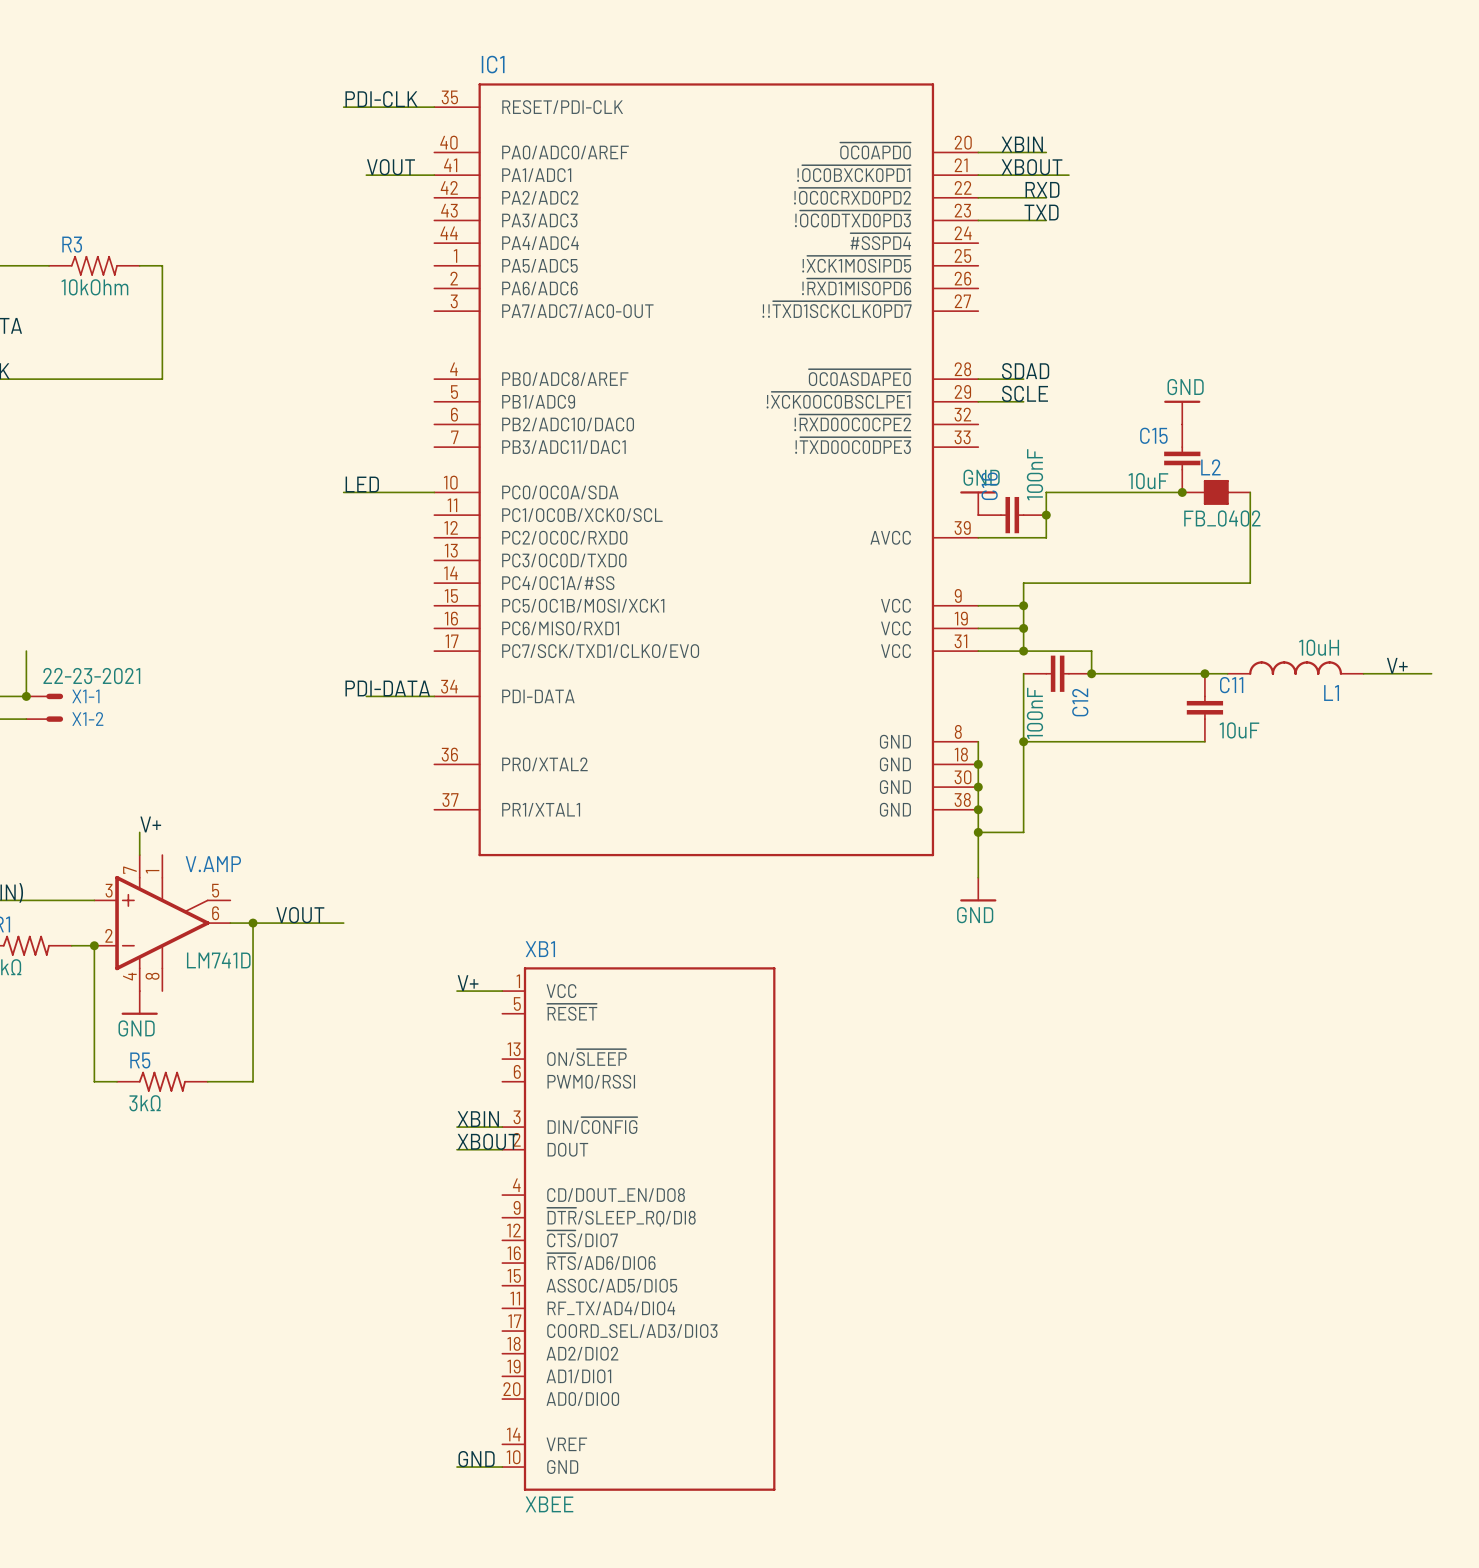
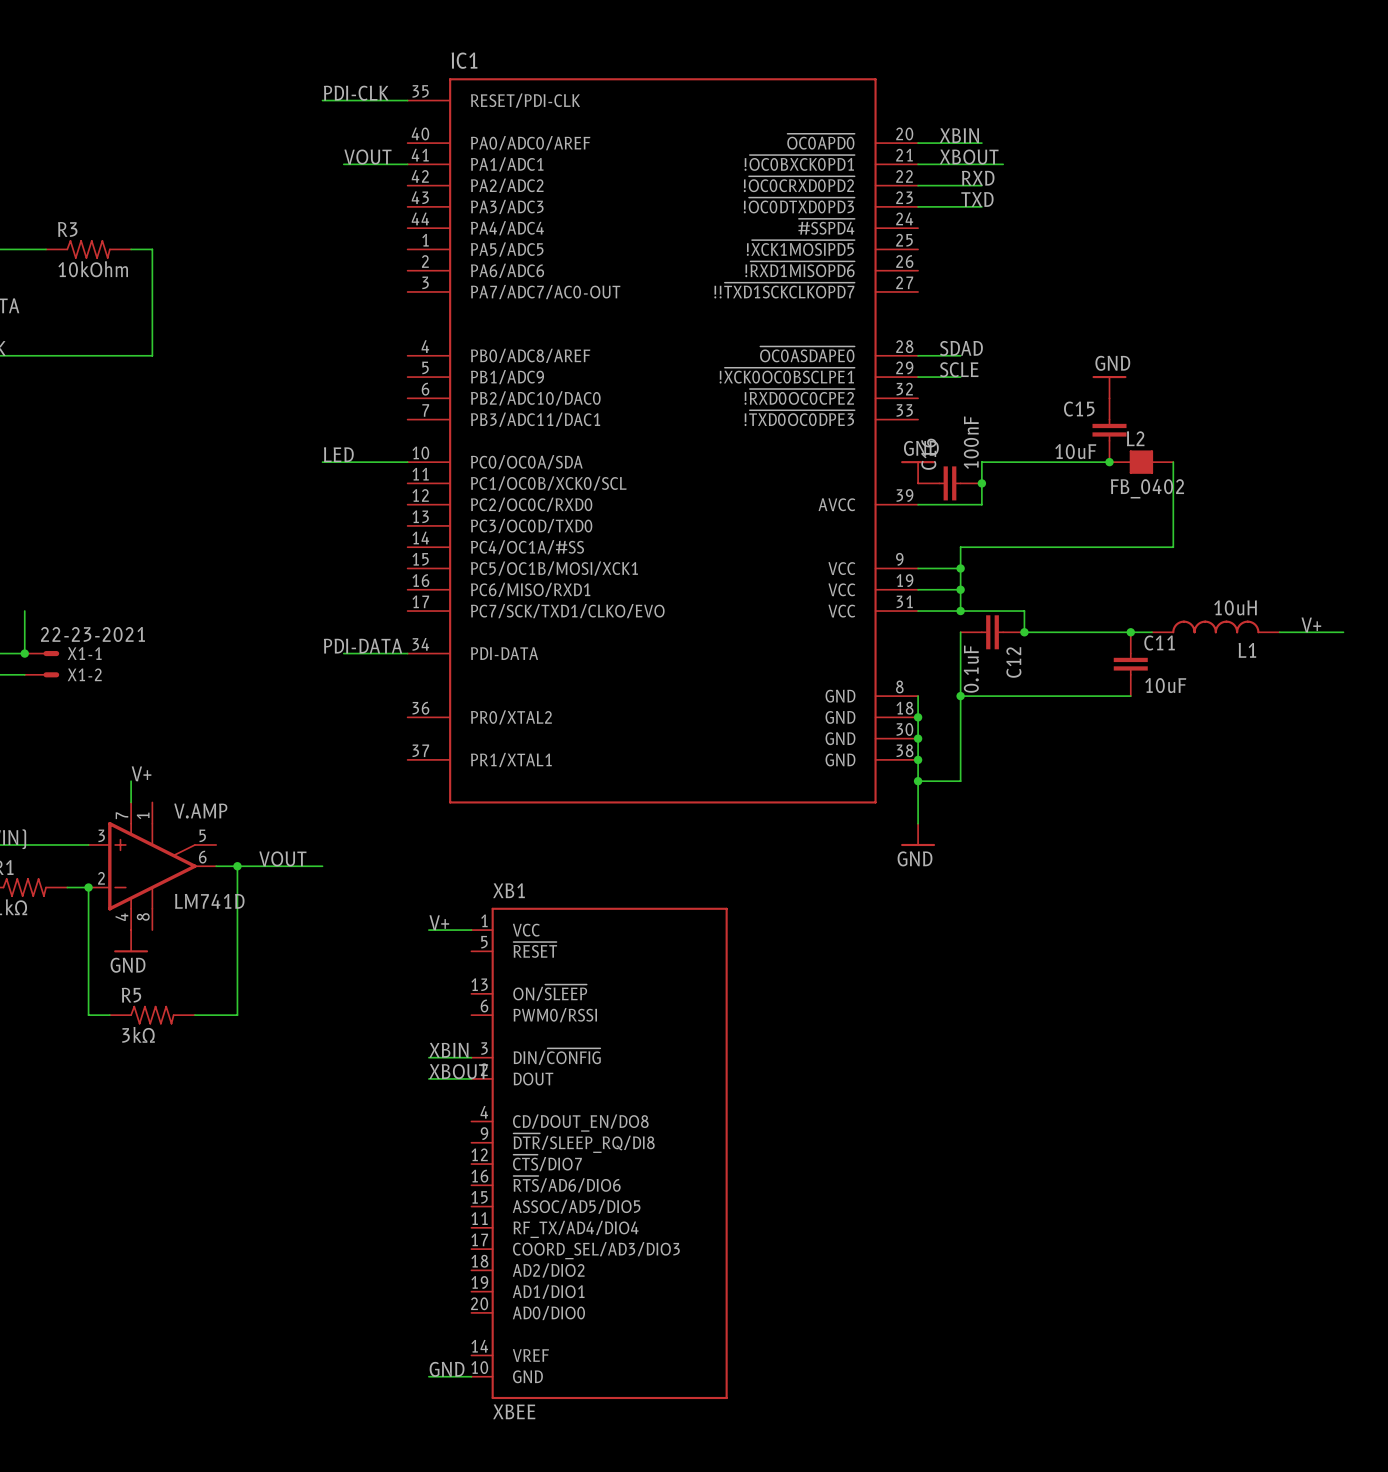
C12 value: 100nF (1034, 713) -> 0.1uF (971, 669)

